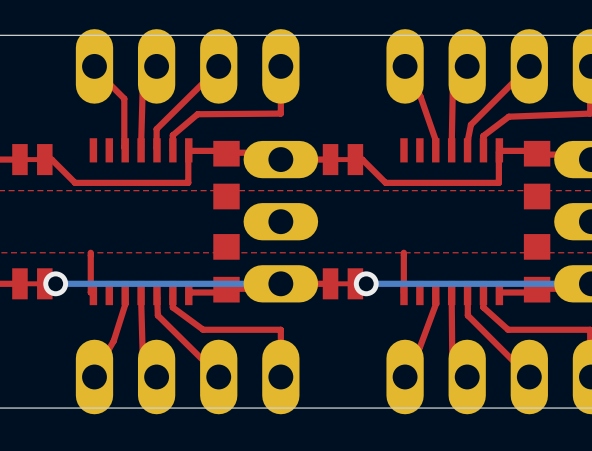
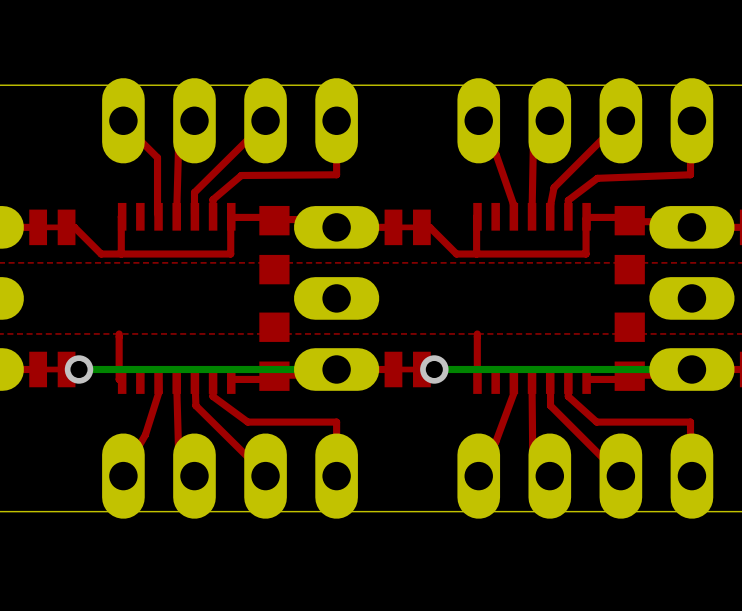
top track: none -> (122, 216) (121, 254)
top track: none -> (477, 216) (476, 254)

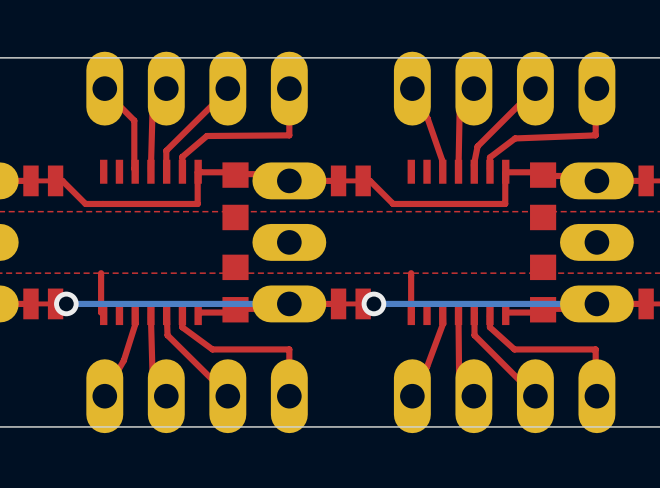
top track: (122, 216) (121, 254) -> none
top track: (477, 216) (476, 254) -> none

